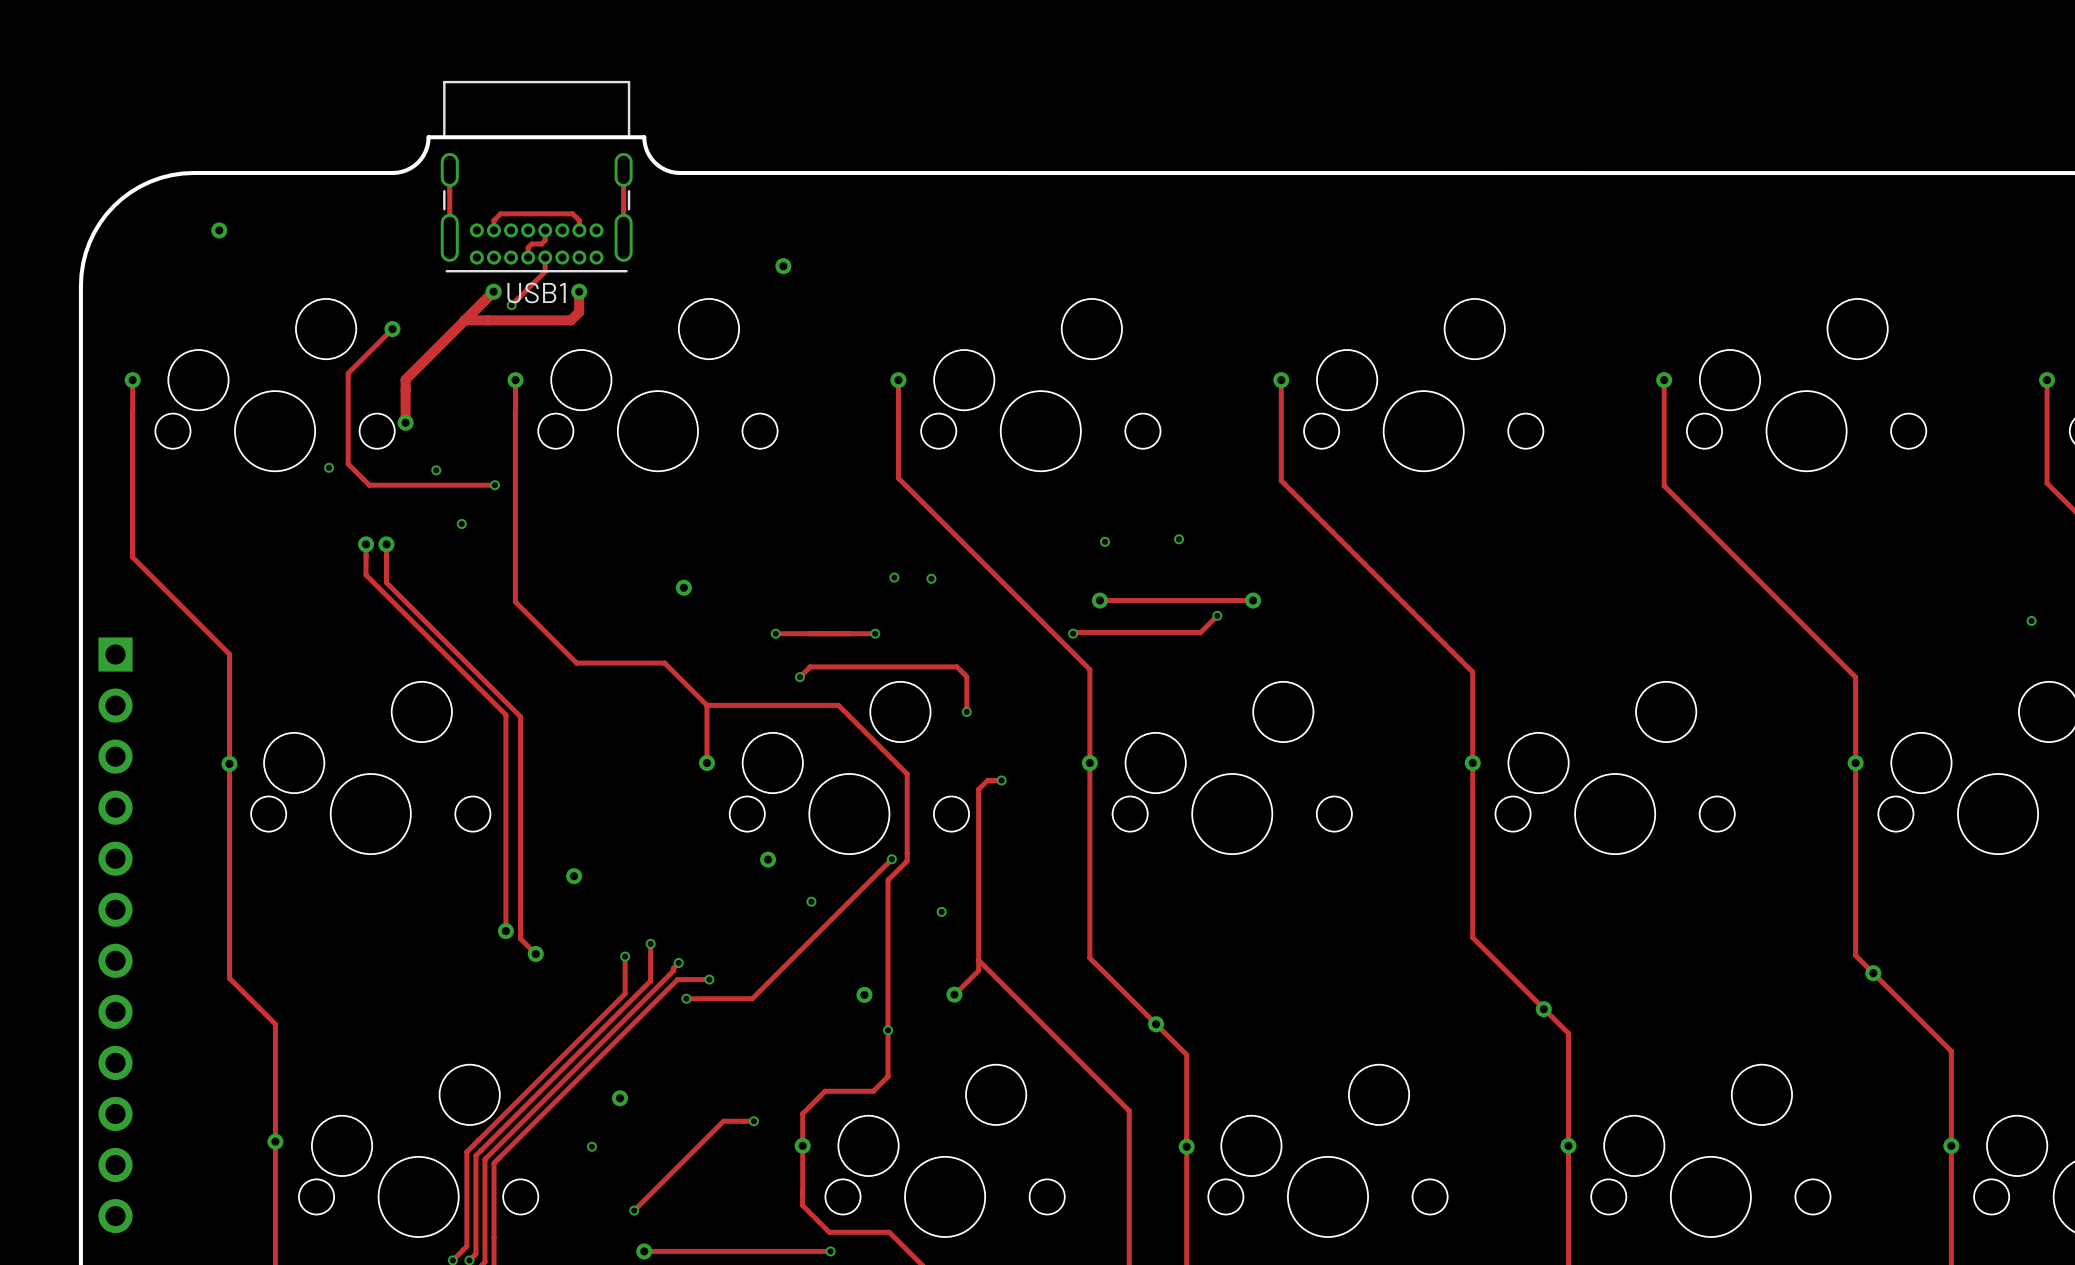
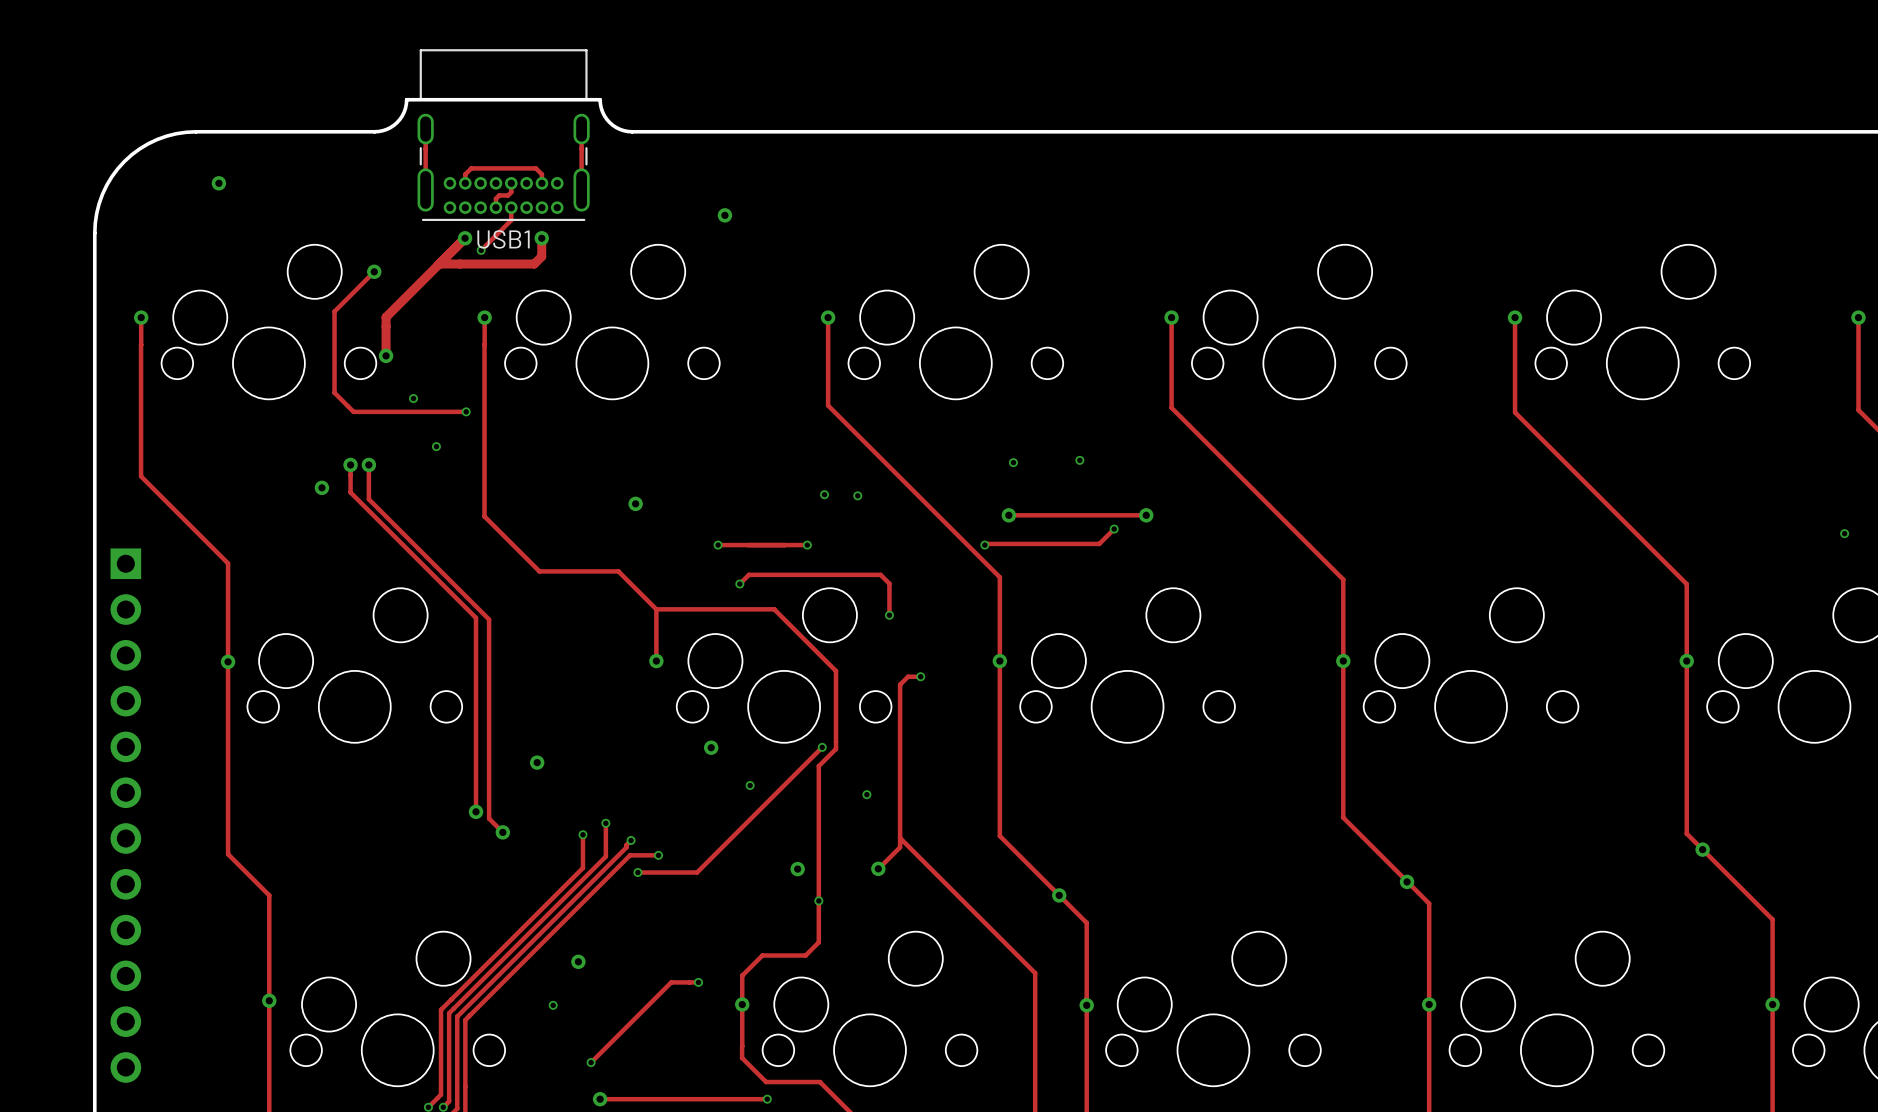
via: (329, 467) -> none
via: none -> (321, 487)

